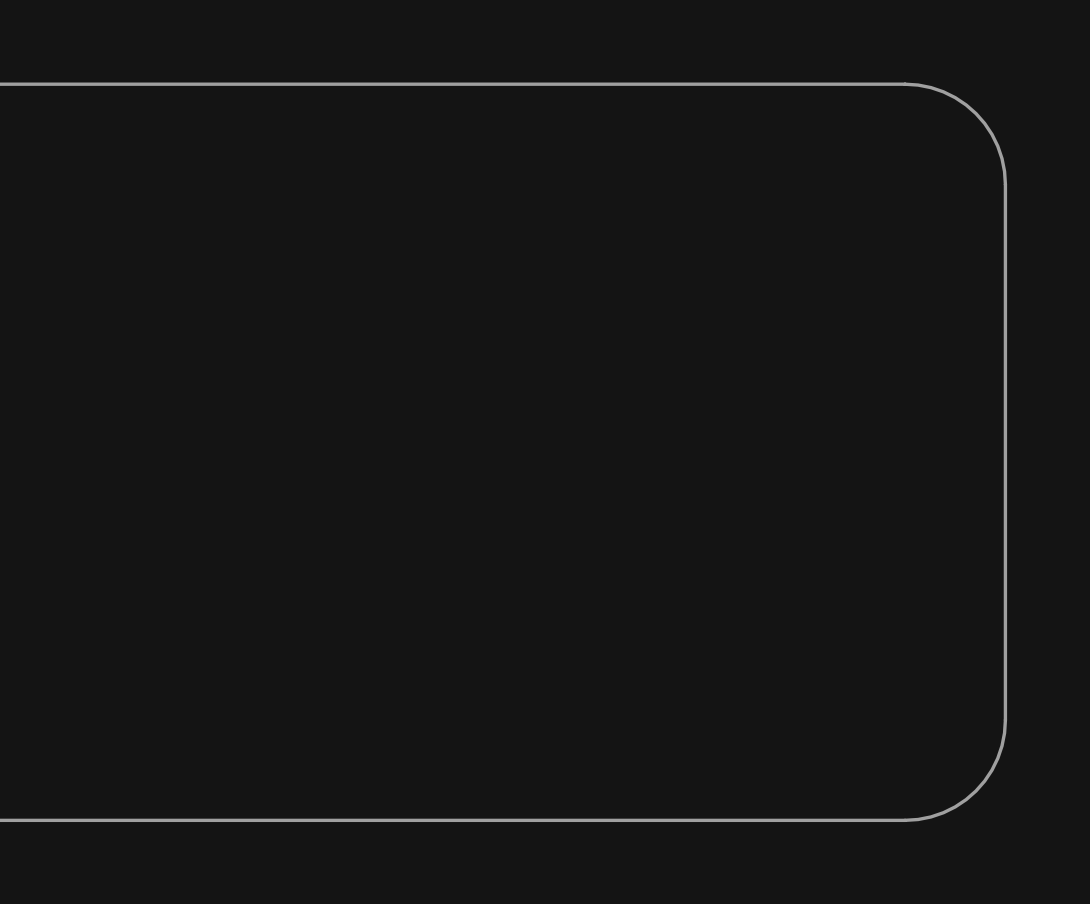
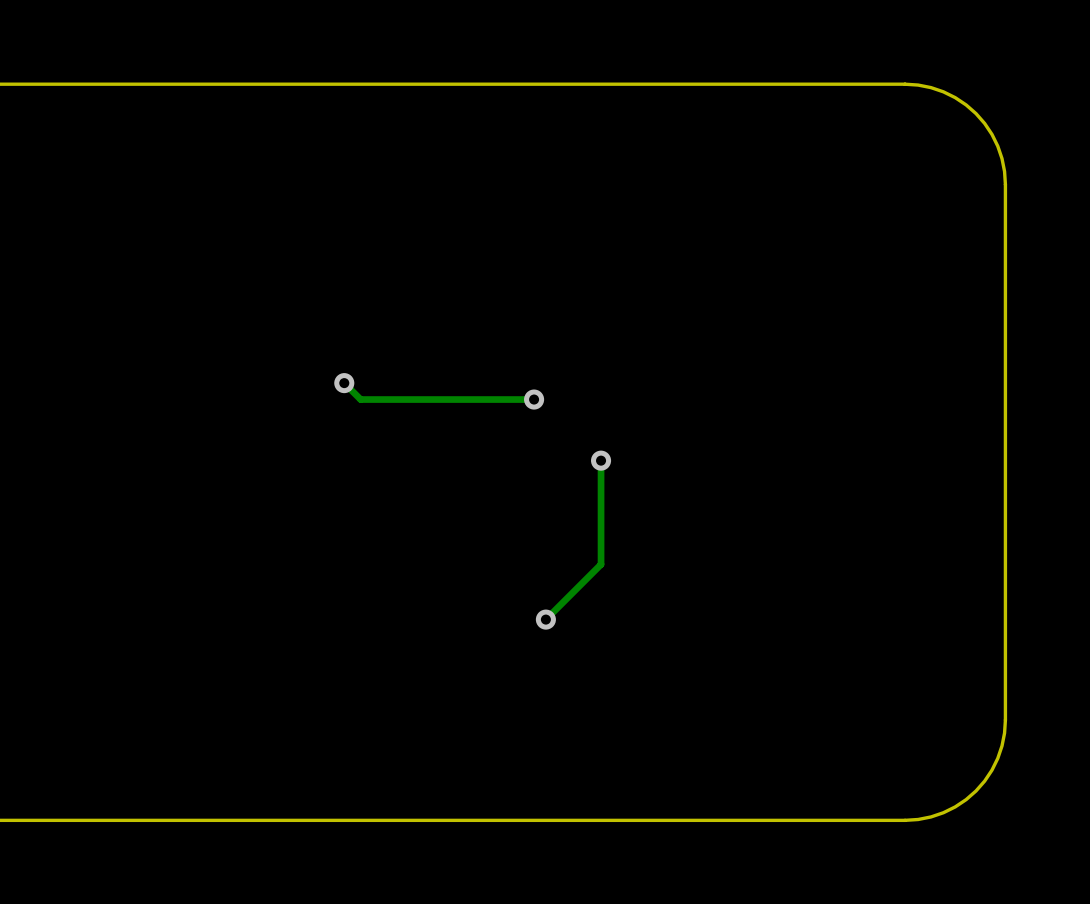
track: none -> (344, 383) (360, 399) (534, 399)
via: none -> (344, 383)
via: none -> (534, 399)
track: none -> (601, 460) (601, 564) (545, 619)
via: none -> (601, 460)
via: none -> (545, 619)

